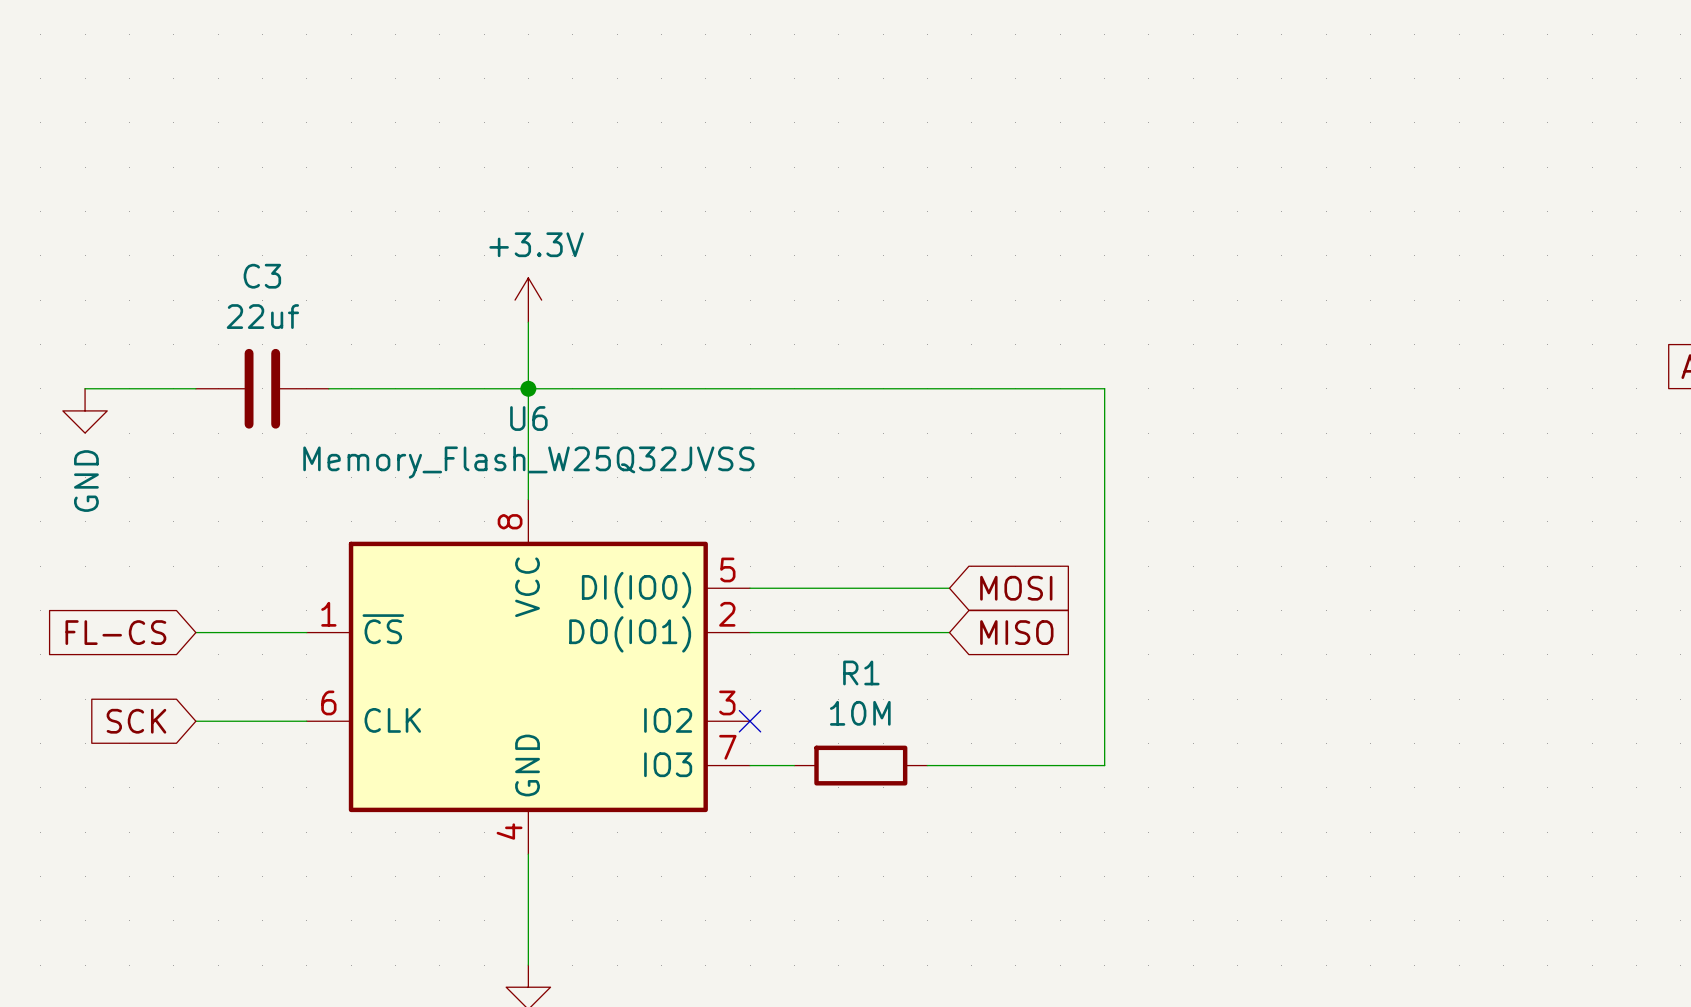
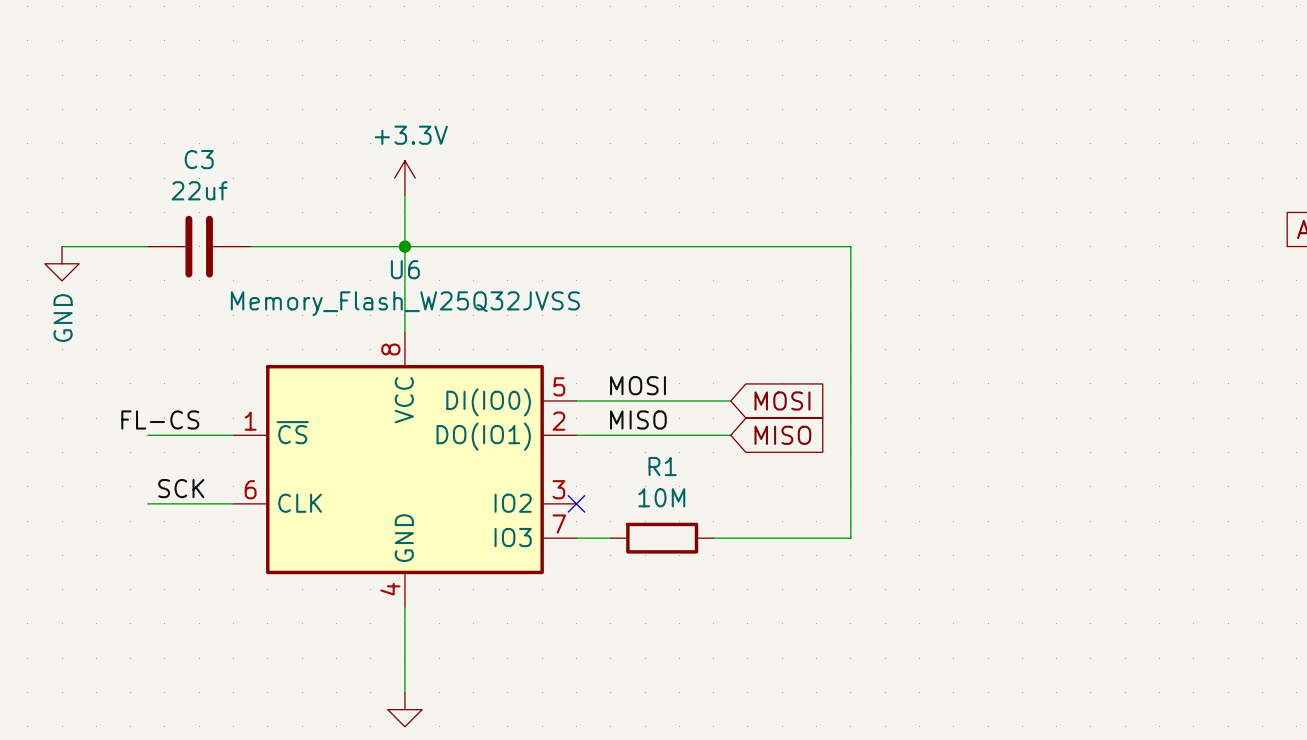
label: none -> MOSI (637, 385)
label: none -> FL-CS (160, 419)
label: none -> MISO (638, 419)
global label: FL-CS (115, 632) -> none
label: none -> SCK (181, 488)
global label: SCK (136, 721) -> none

